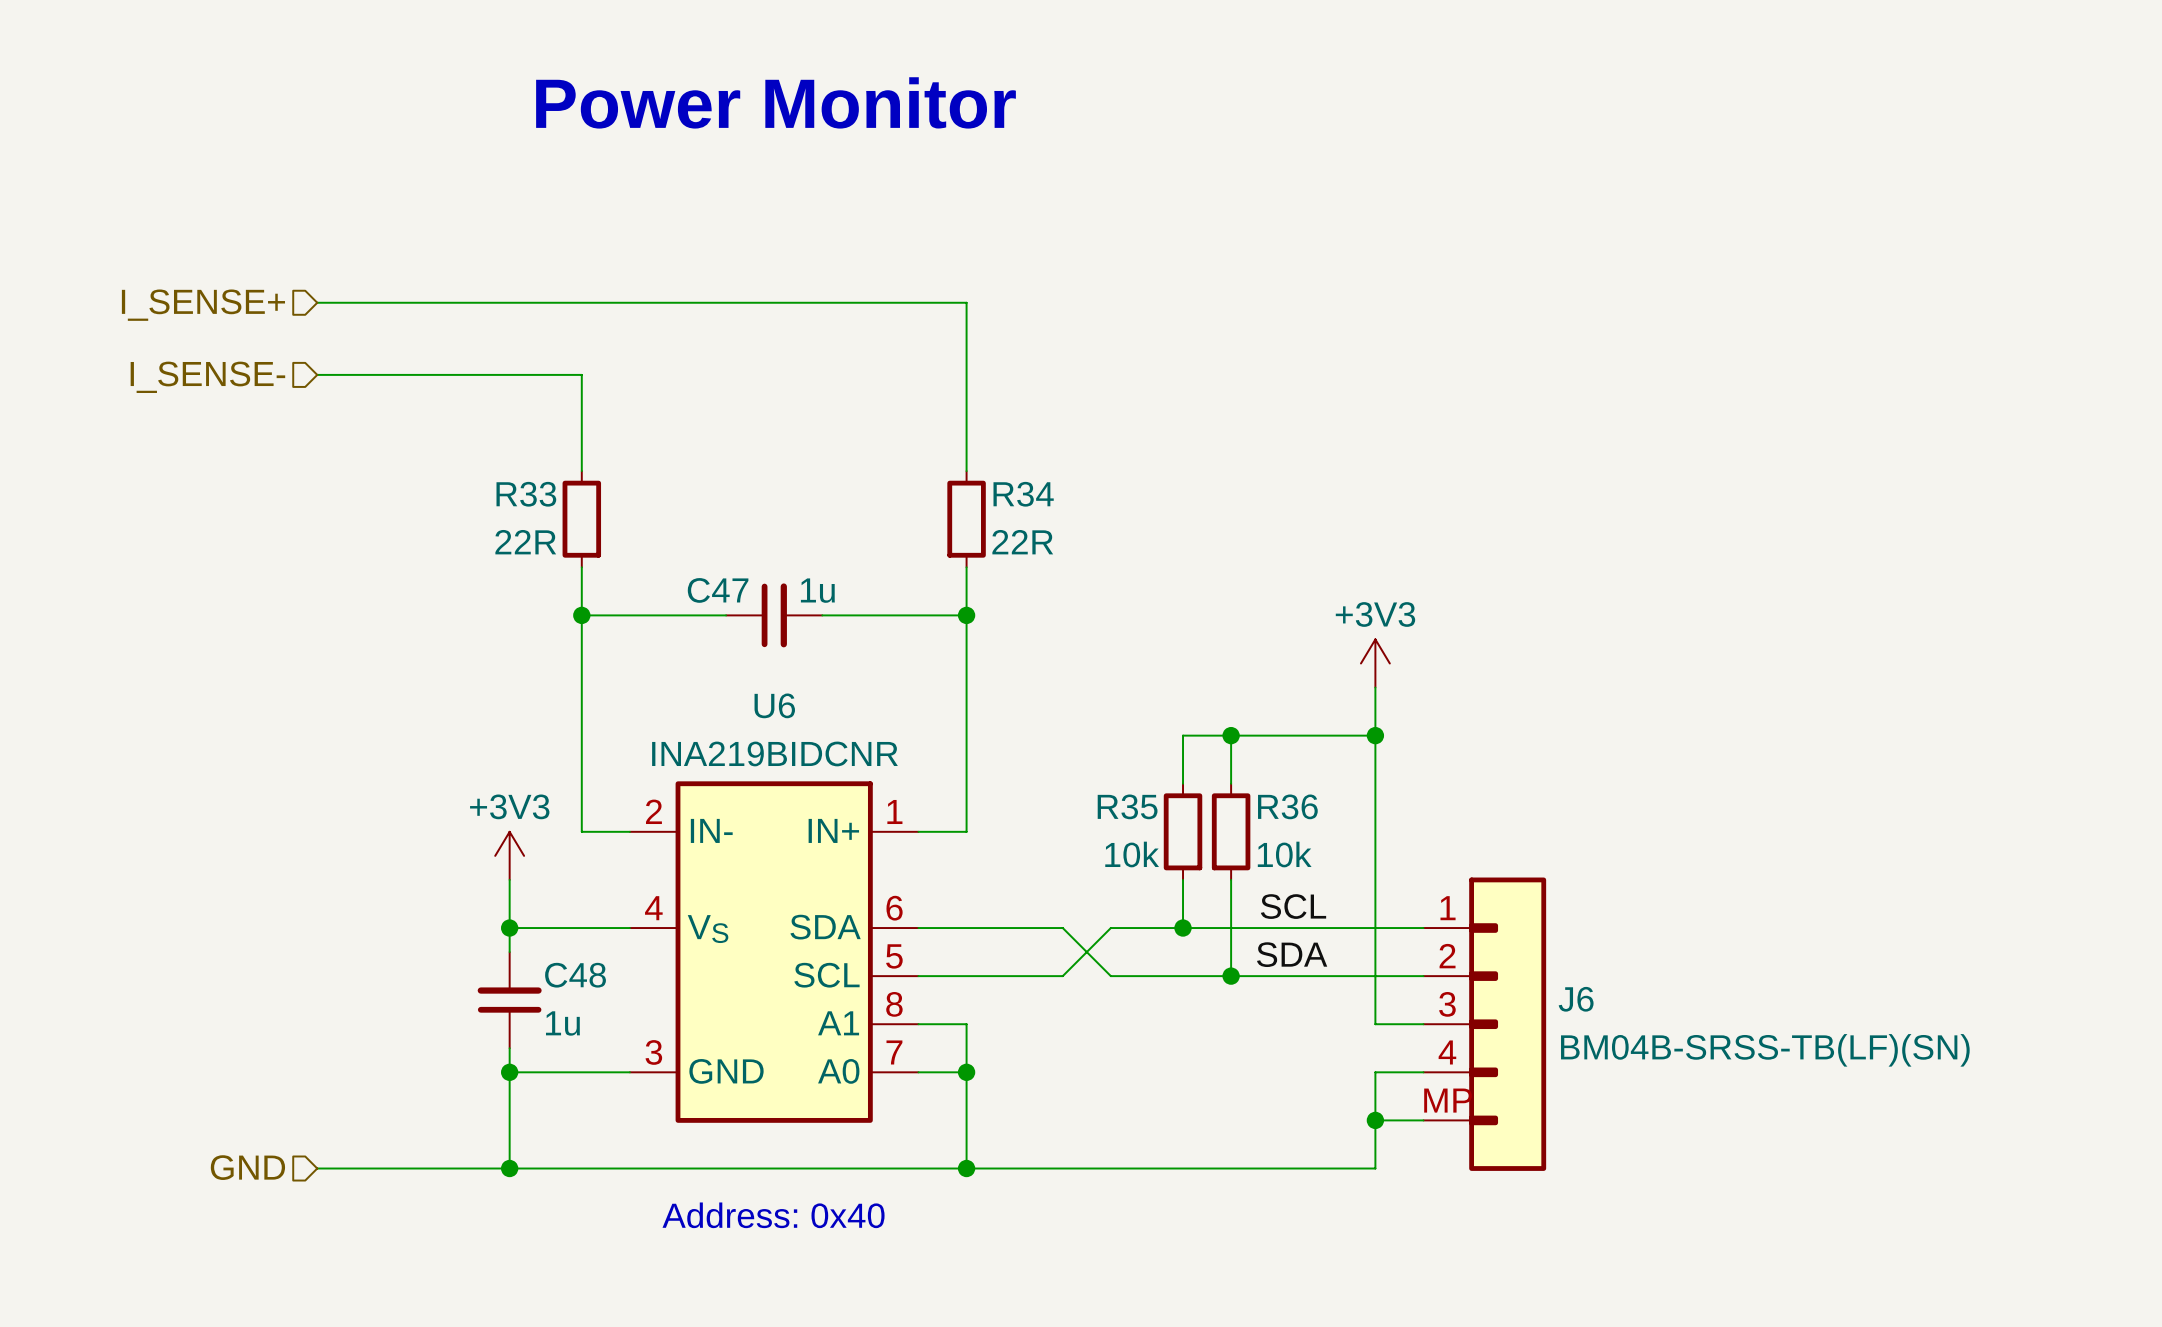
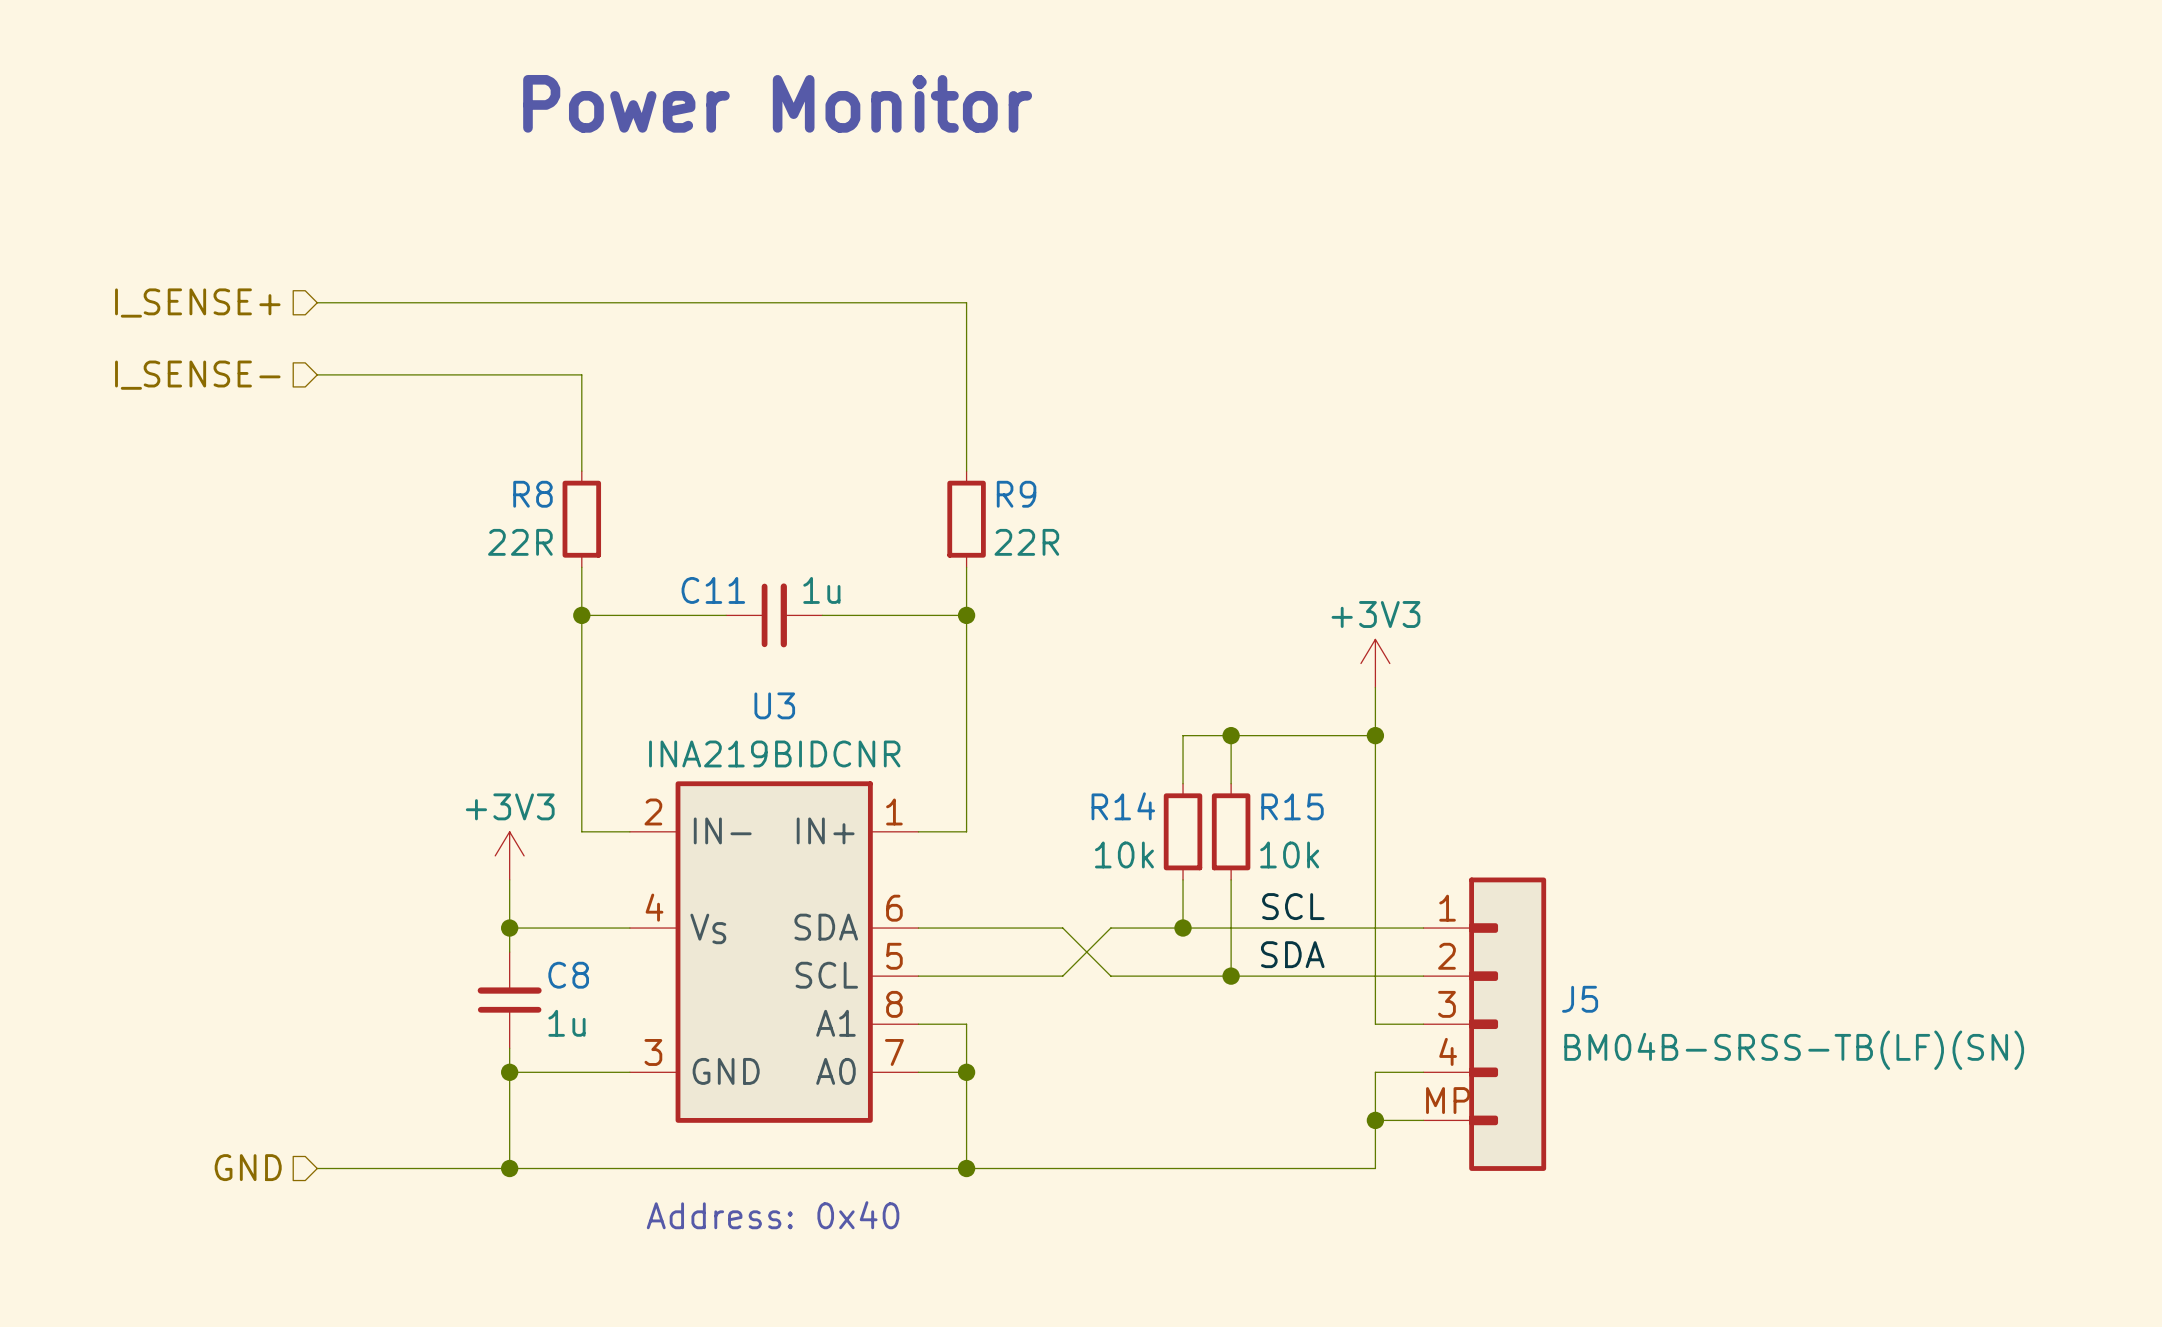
R33 name: R33 (526, 494) -> R8 (532, 494)
R34 name: R34 (1023, 494) -> R9 (1016, 494)
C47 name: C47 (718, 590) -> C11 (713, 590)
U6 name: U6 (774, 705) -> U3 (774, 705)
R35 name: R35 (1127, 806) -> R14 (1123, 806)
R36 name: R36 (1287, 806) -> R15 (1292, 806)
C48 name: C48 (575, 975) -> C8 (568, 975)
J6 name: J6 (1576, 999) -> J5 (1580, 999)

